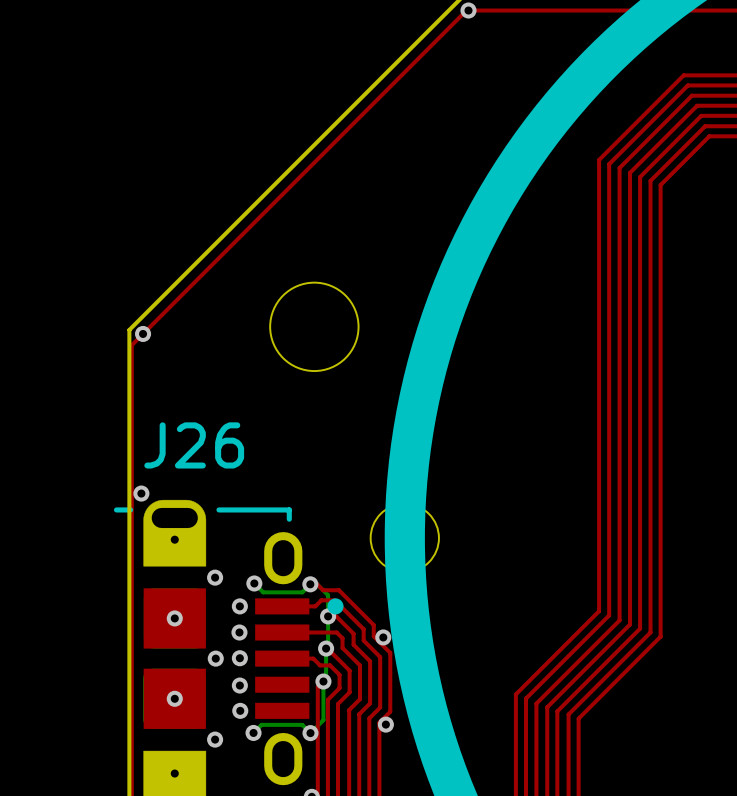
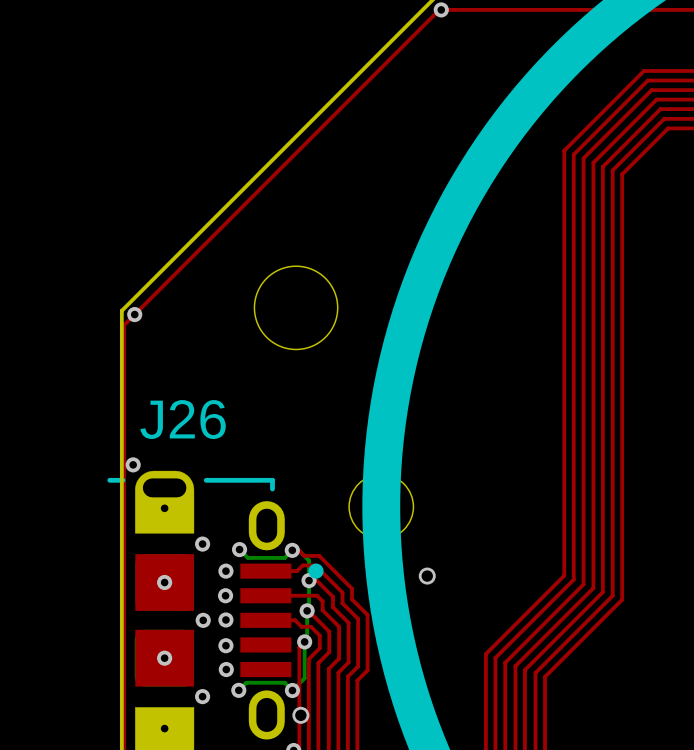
via: none -> (427, 576)
via: (383, 637) -> none
via: (385, 724) -> none
via: none -> (300, 715)

